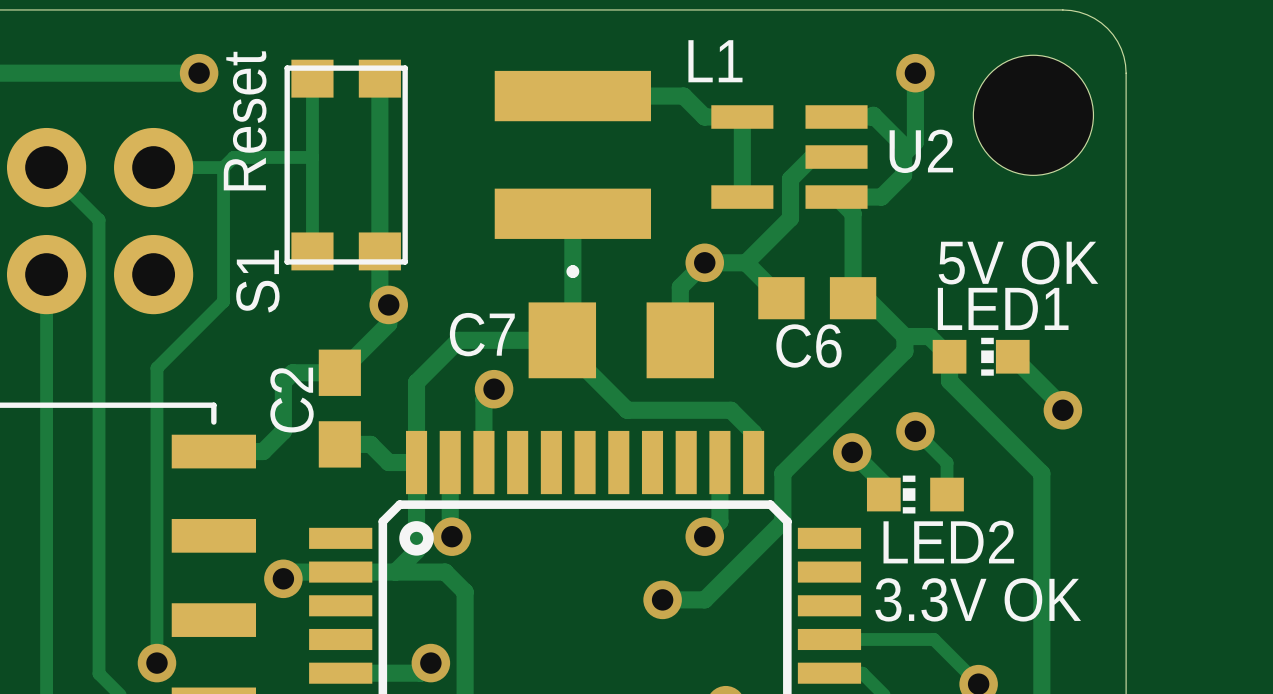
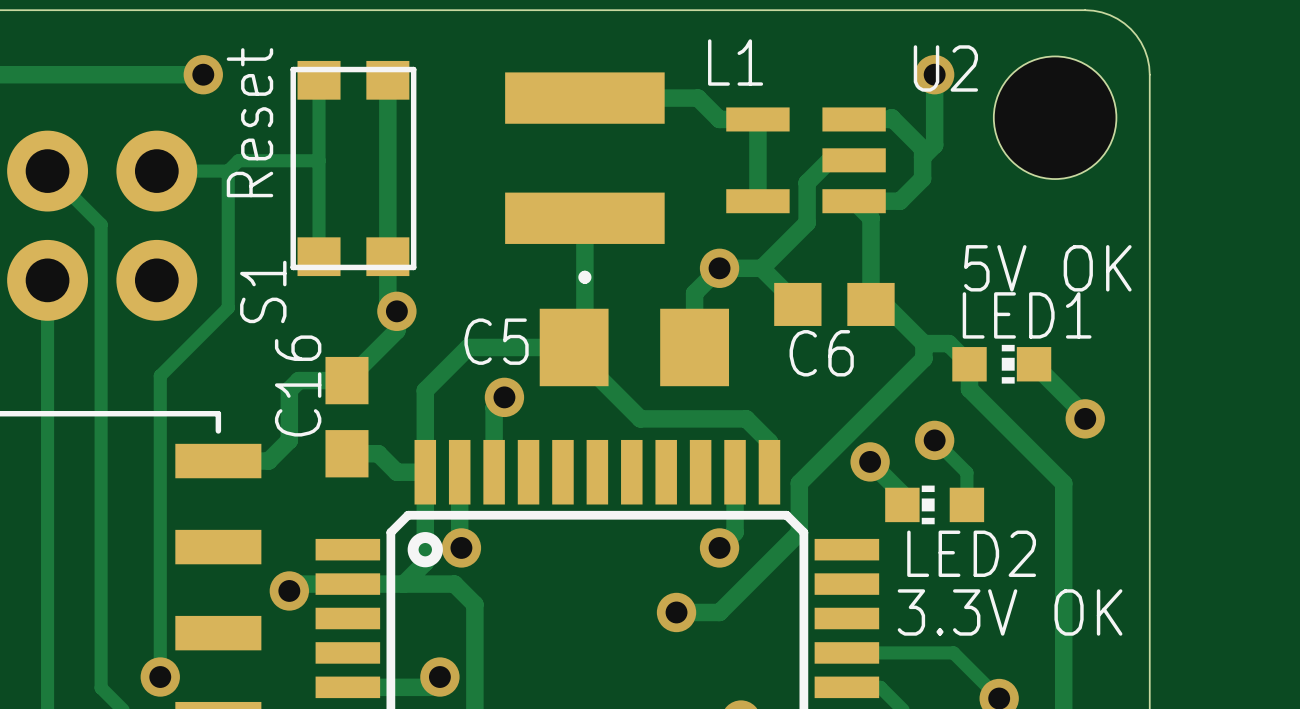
U2 name position: U2 (921, 151) -> U2 (945, 68)
C7 name: C7 (482, 334) -> C5 (496, 341)
C2 name: C2 (292, 400) -> C16 (298, 385)

